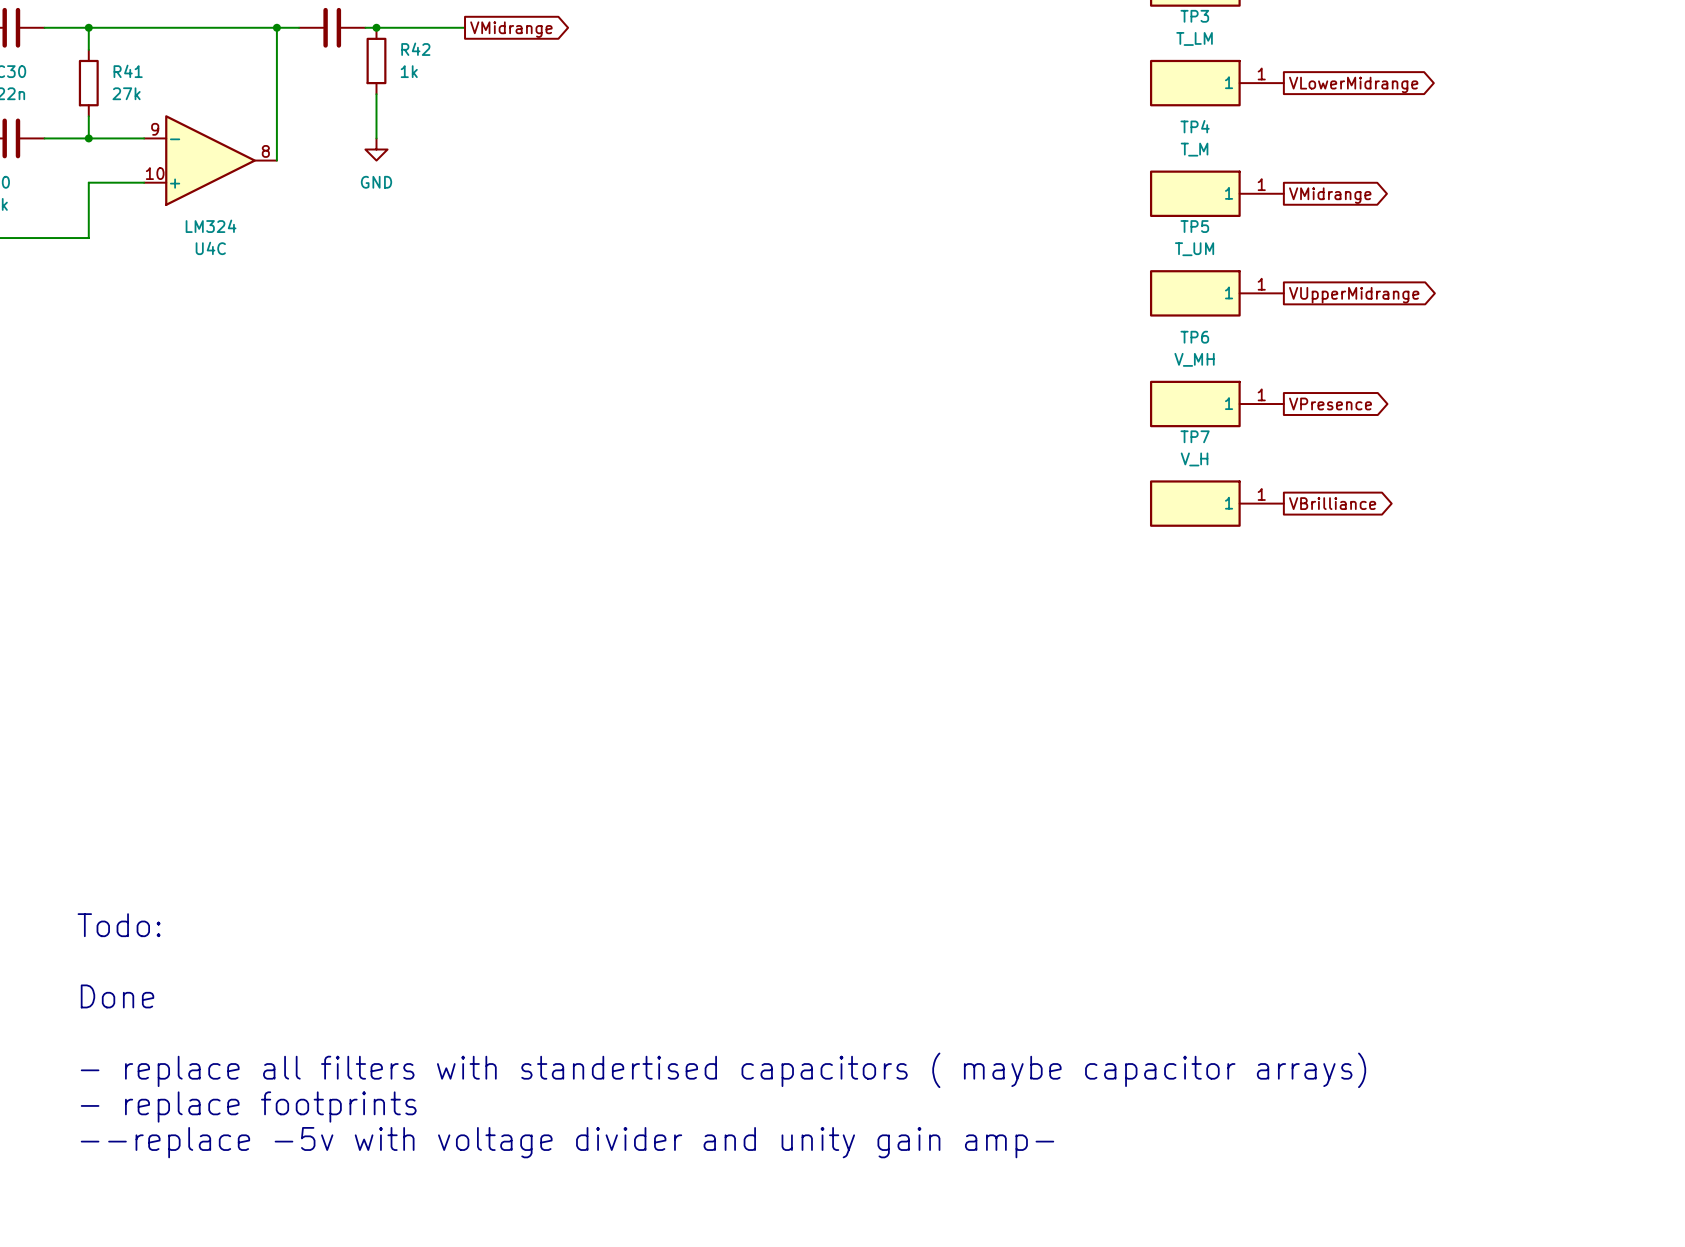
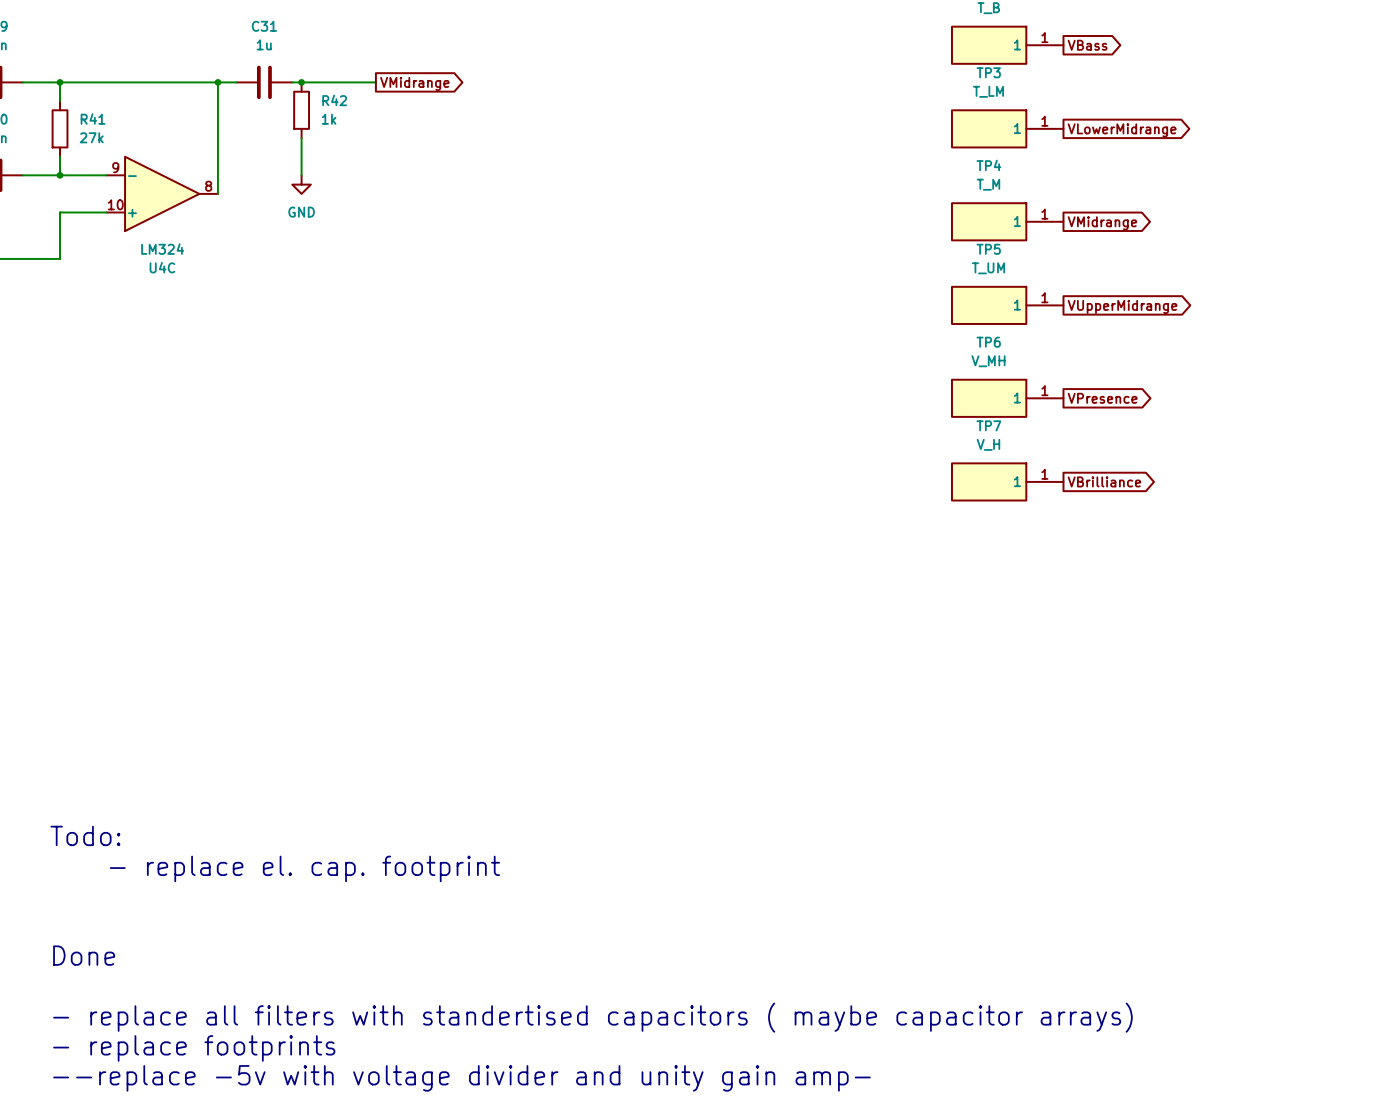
text: none -> - replace el. cap. footprint (304, 868)
text: Done (117, 996) -> none
text: - replace all filters with standertised capacitors ( maybe capacitor arrays) (723, 1070) -> Done (84, 955)
text position: - replace footprints (248, 1107) -> - replace footprints (194, 1048)
text: --replace -5v with voltage divider and unity gain amp- (567, 1142) -> - replace all filters with standertised capacitors ( maybe capacitor arrays) (592, 1017)
text: none -> --replace -5v with voltage divider and unity gain amp- (461, 1078)

